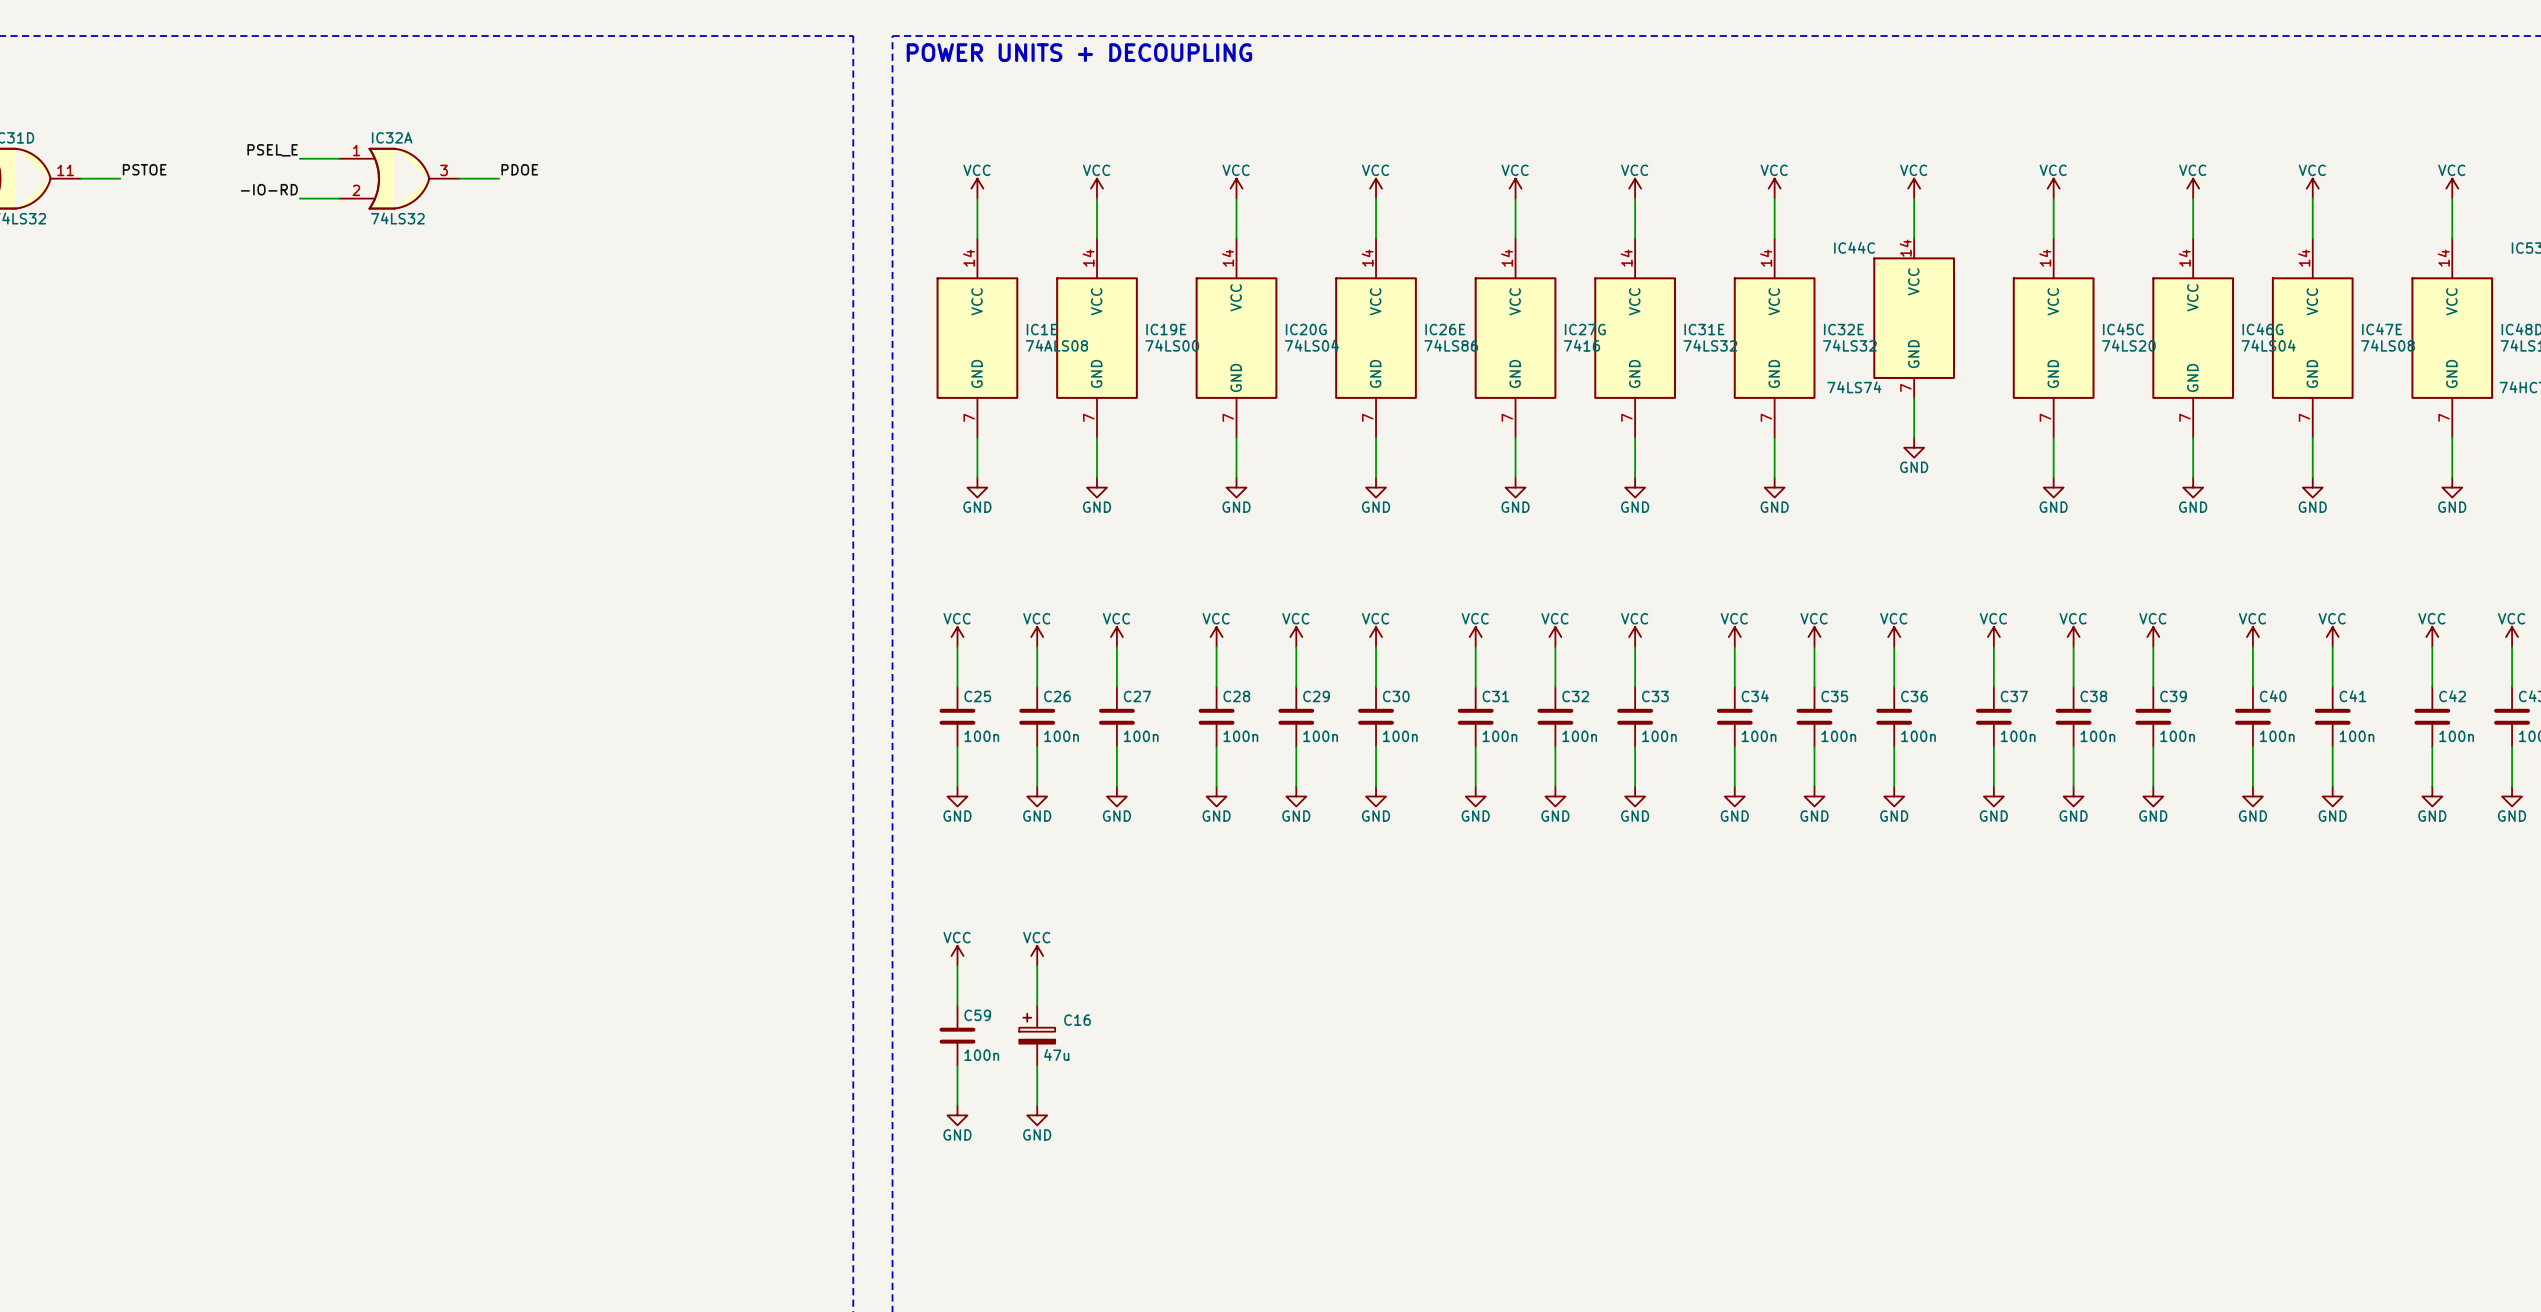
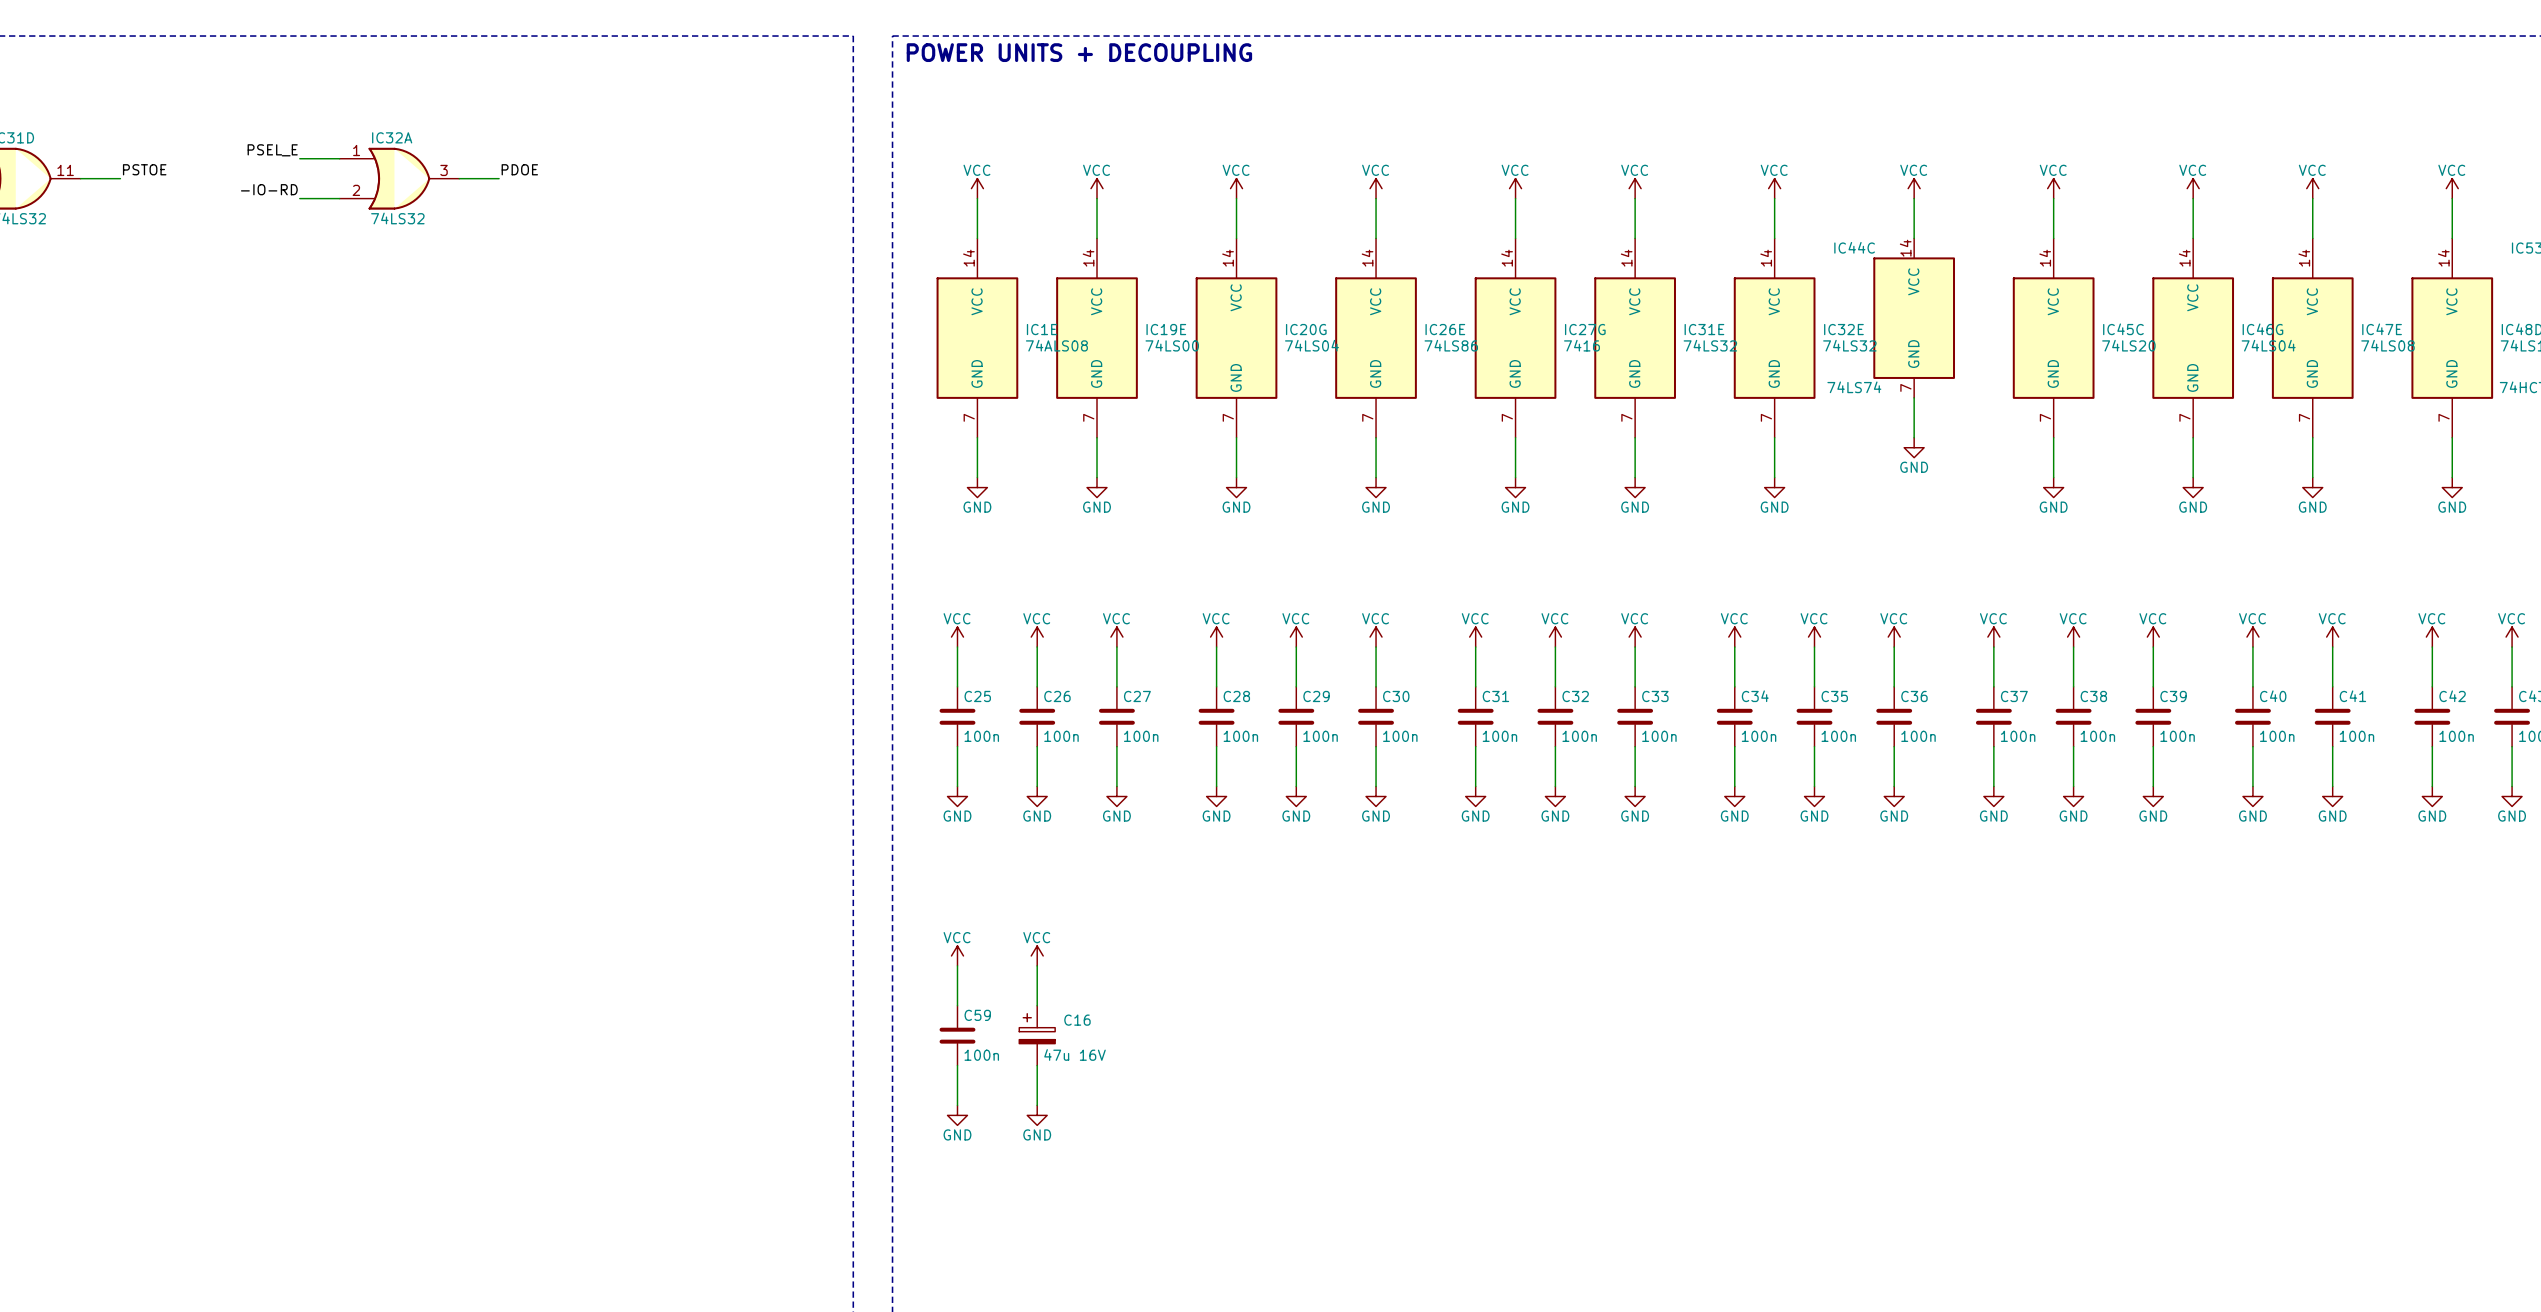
C16 value: 47u (1056, 1054) -> 47u 16V (1075, 1054)

